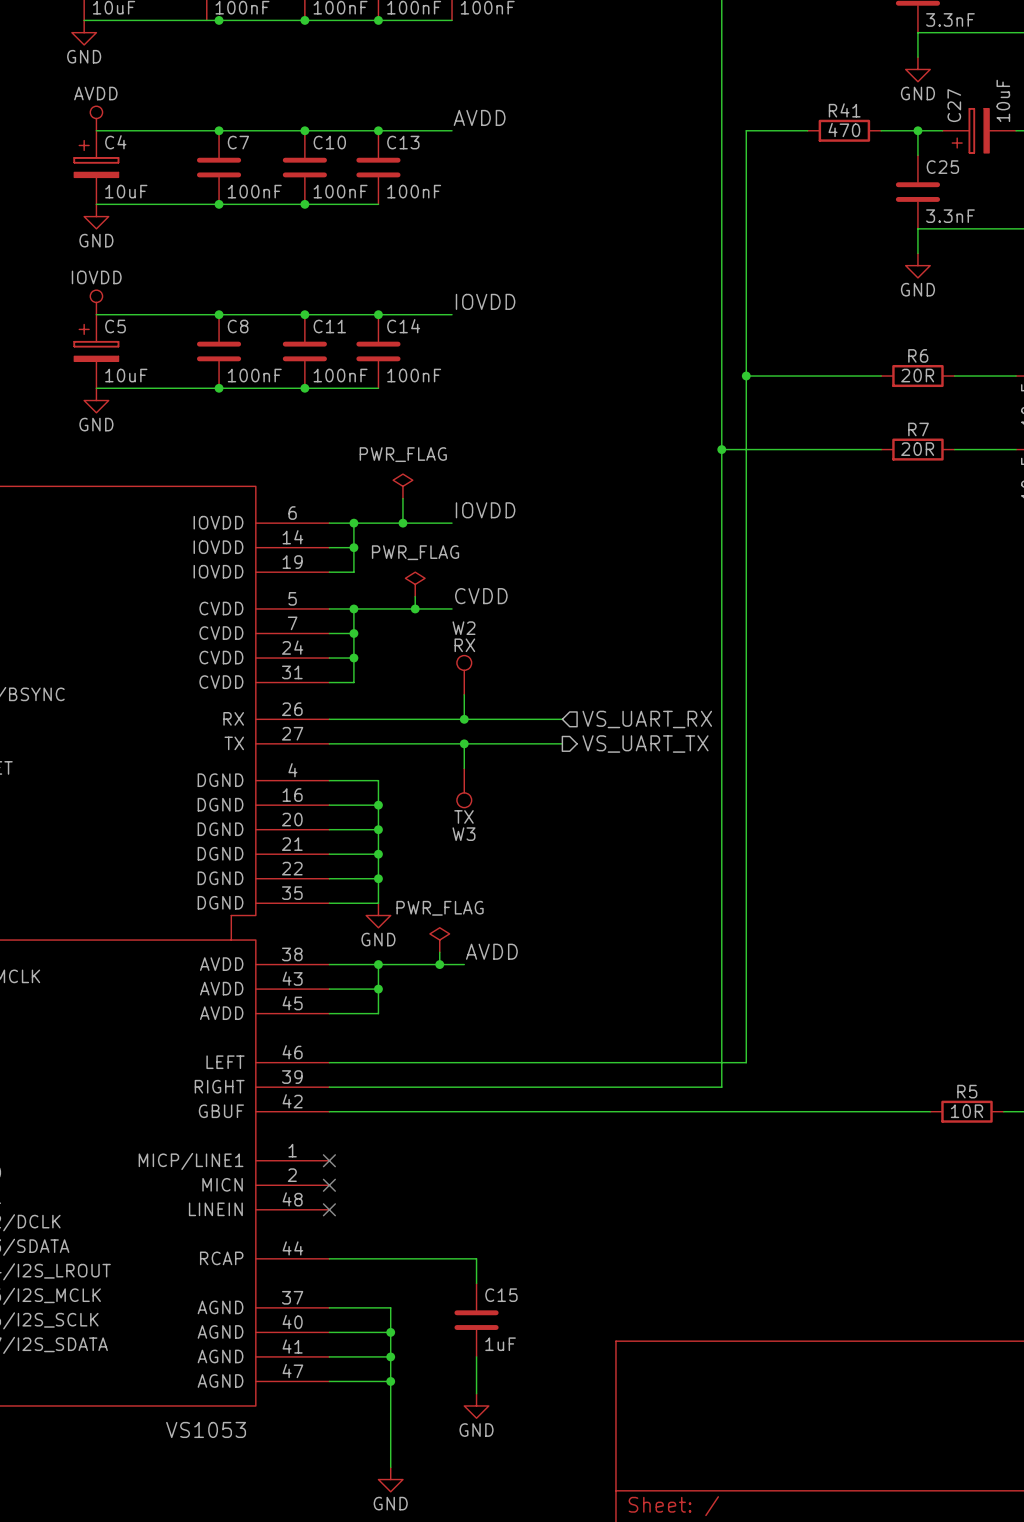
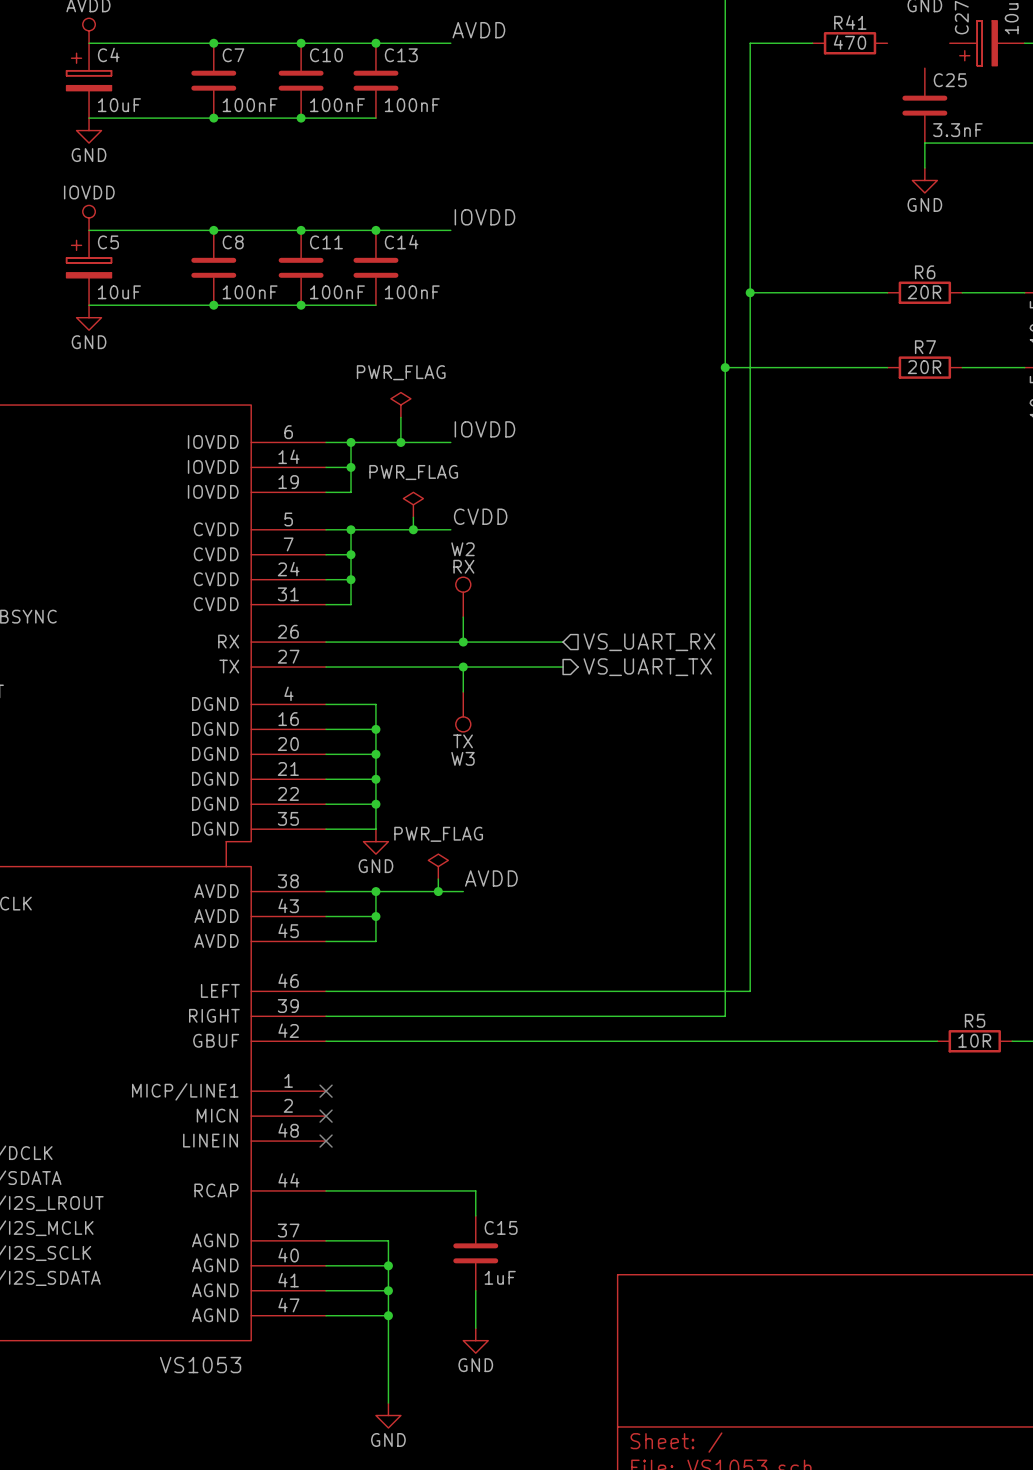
wire: (881, 130) (942, 130) -> none
wire: (917, 130) (917, 155) -> none
junction: (917, 130) -> none

